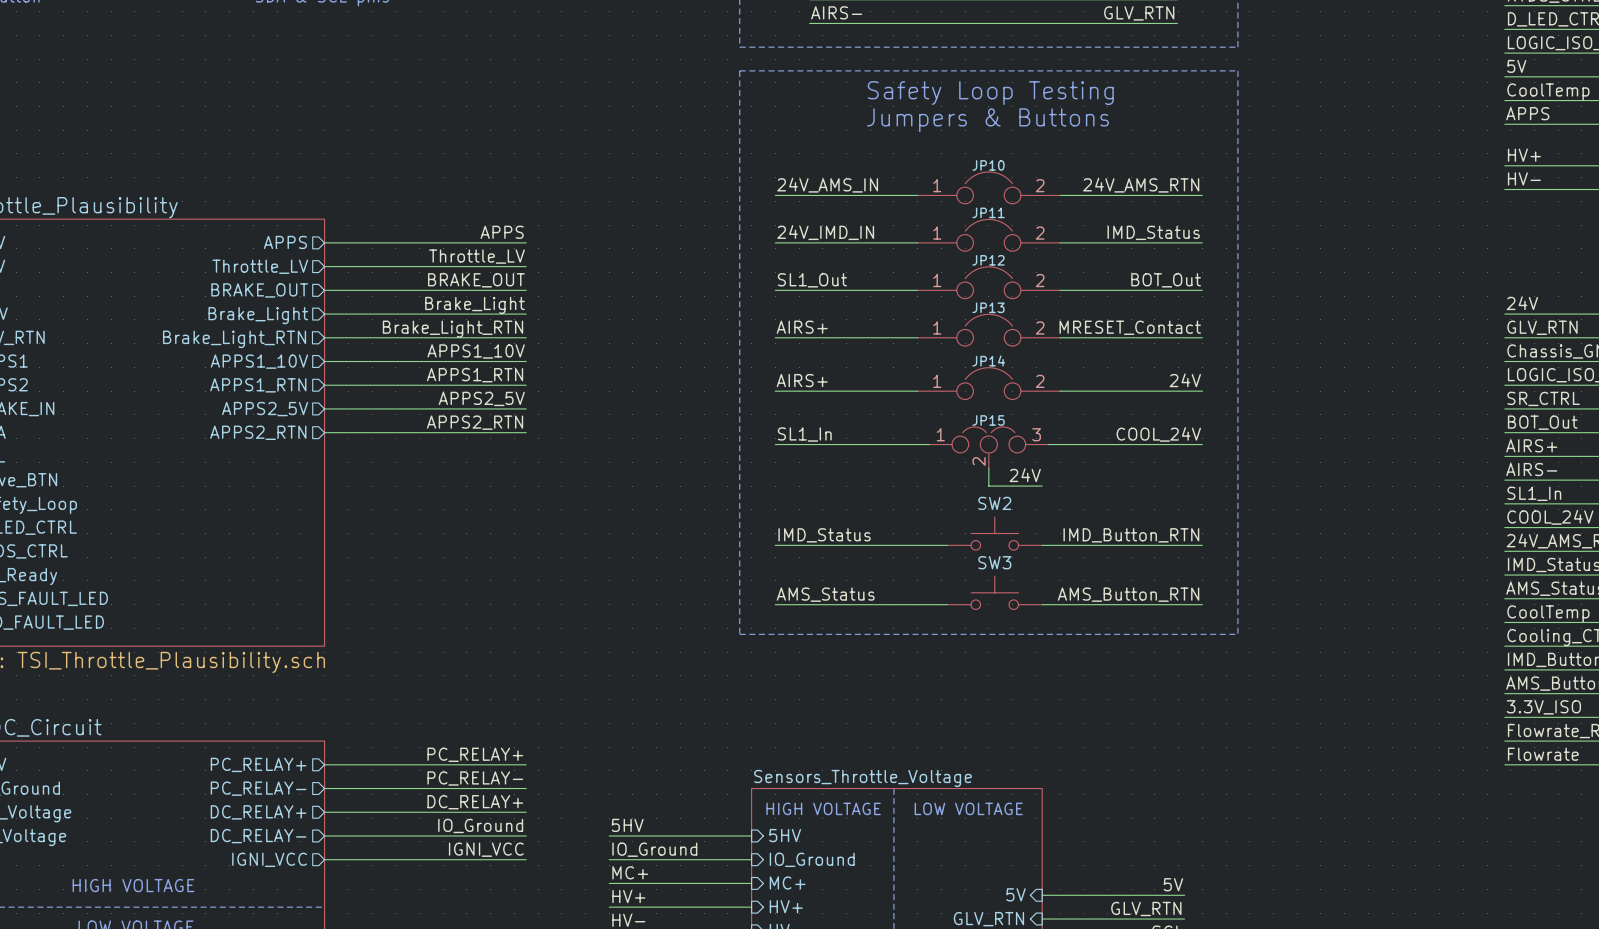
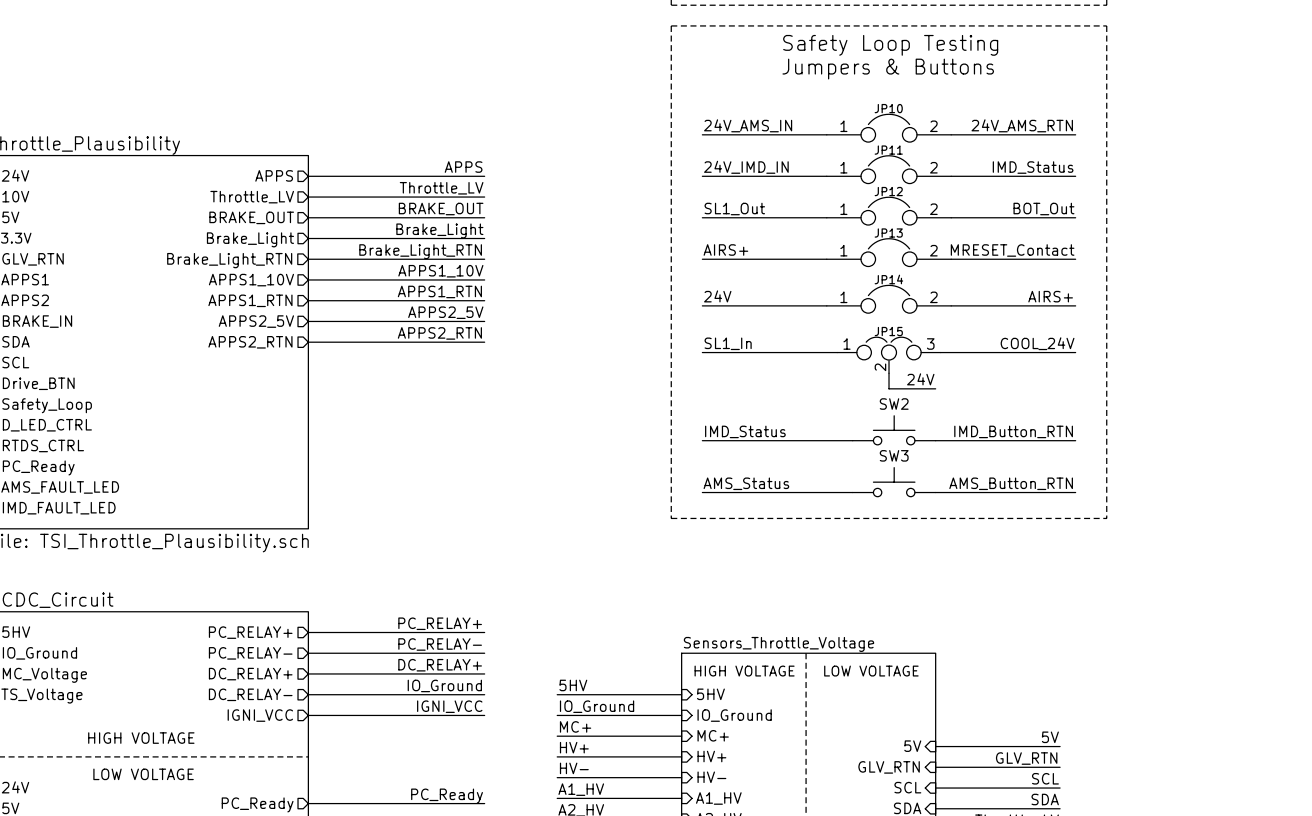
label: AIRS+ (802, 380) -> 24V (717, 296)
label: 24V (1185, 380) -> AIRS+ (1050, 296)

